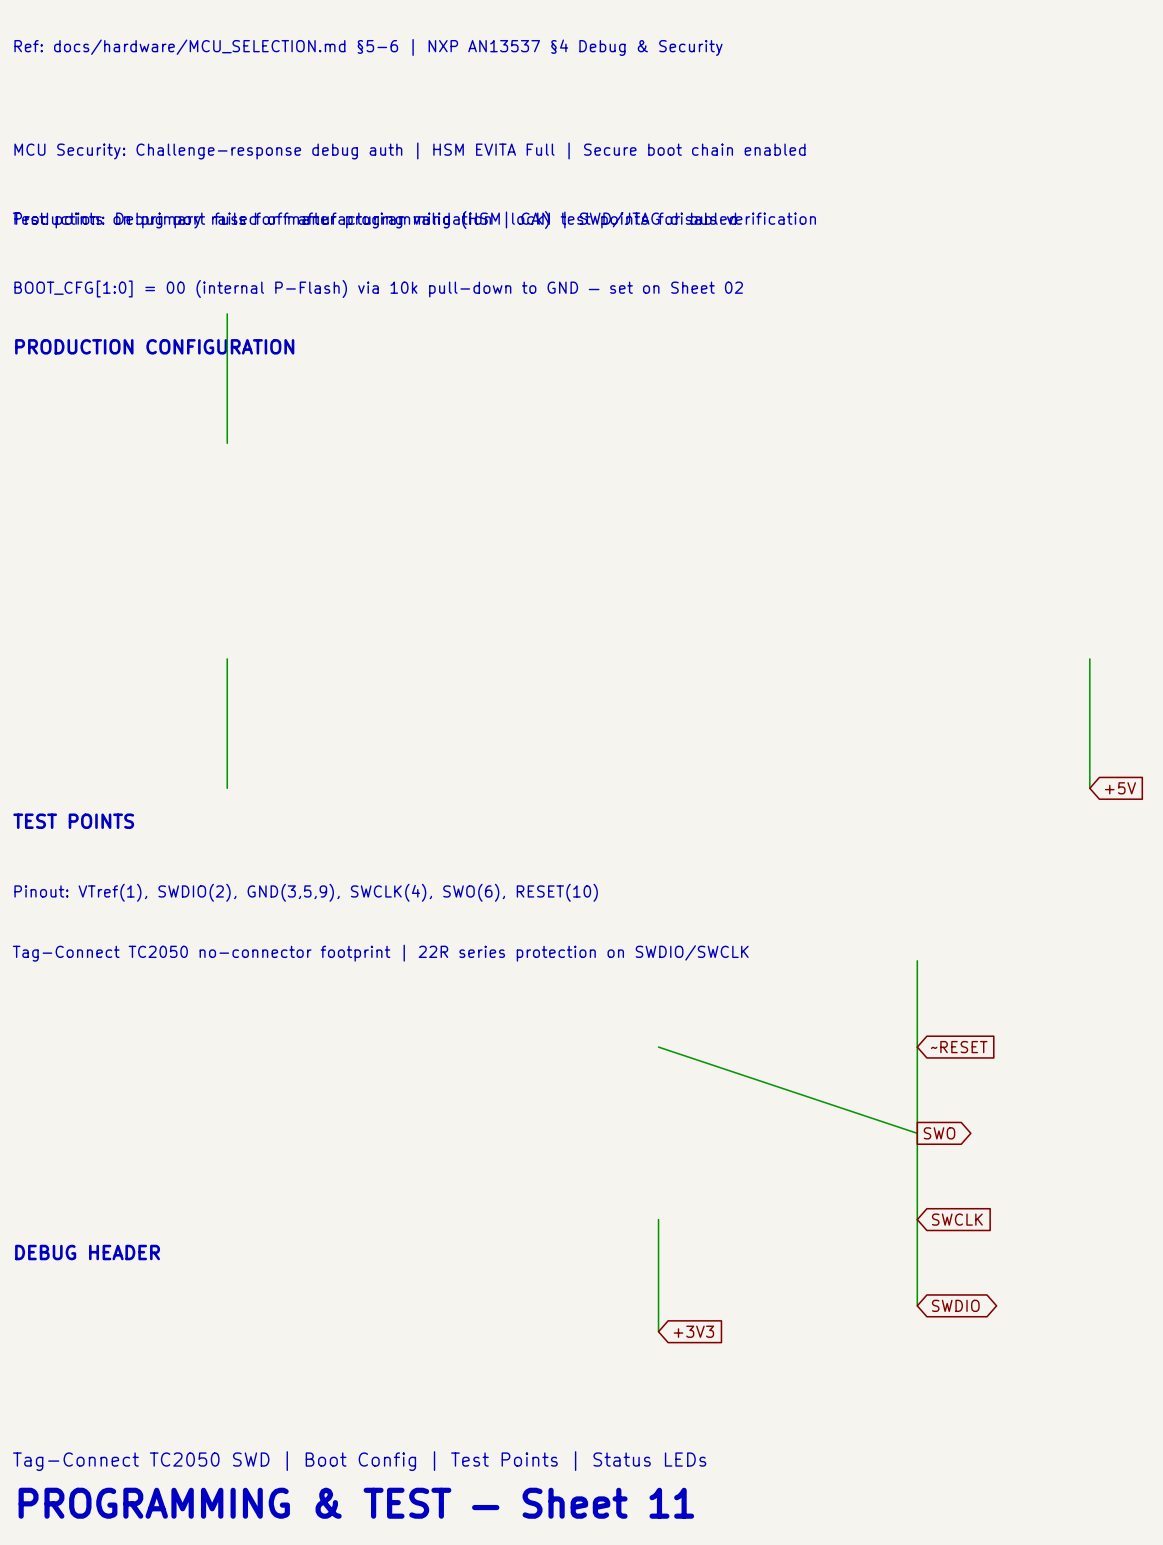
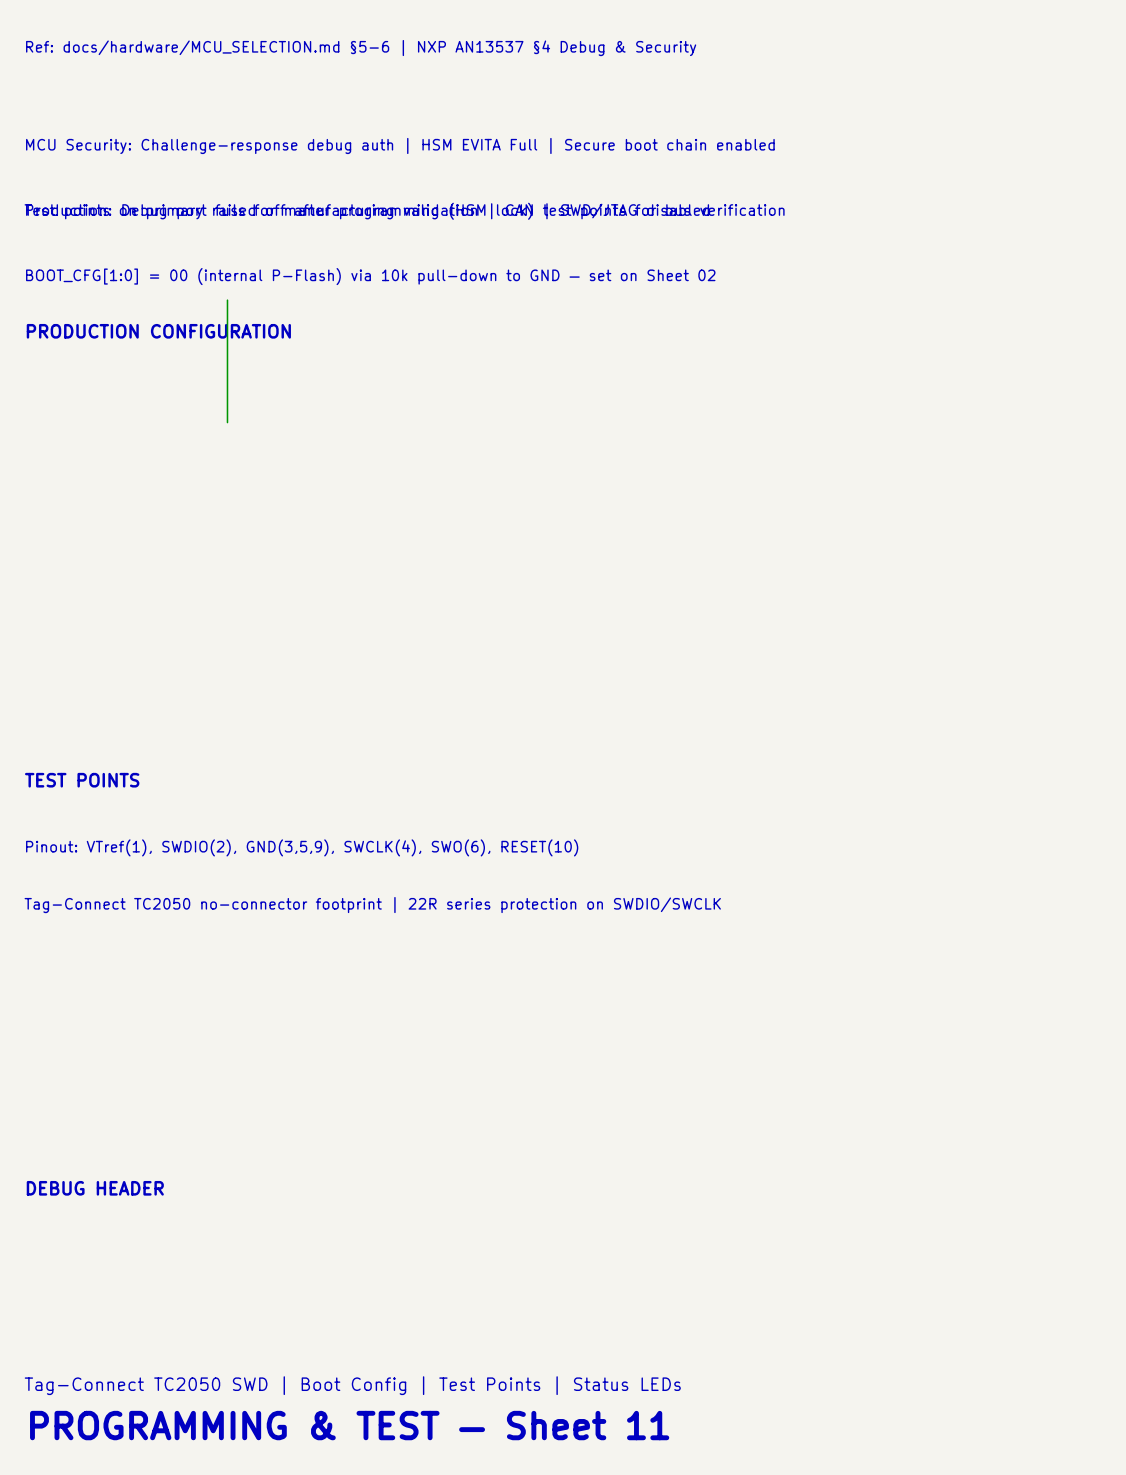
wire: (227, 658) (227, 788) -> none
wire: (1089, 658) (1089, 788) -> none
global label: +5V (1120, 788) -> none
wire: (917, 960) (917, 1305) -> none
wire: (658, 1047) (917, 1133) -> none
global label: ~RESET (959, 1047) -> none
global label: SWO (939, 1133) -> none
wire: (658, 1219) (658, 1331) -> none
global label: SWCLK (957, 1219) -> none
global label: SWDIO (955, 1305) -> none
global label: +3V3 (693, 1331) -> none

